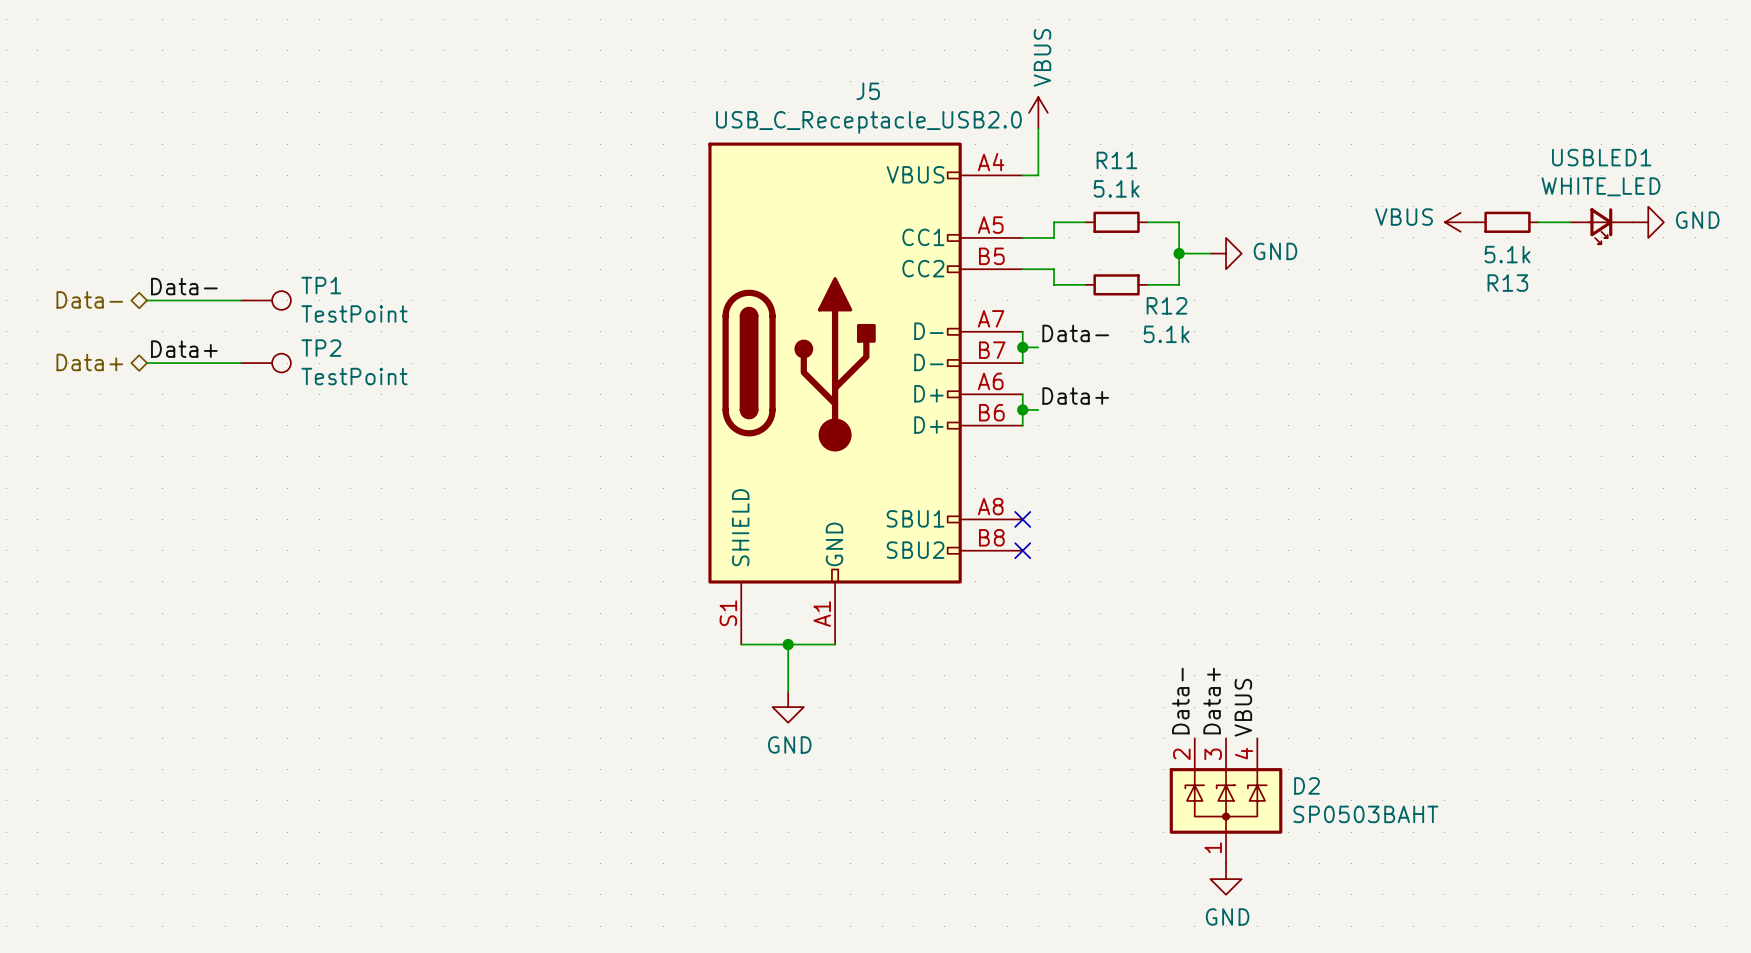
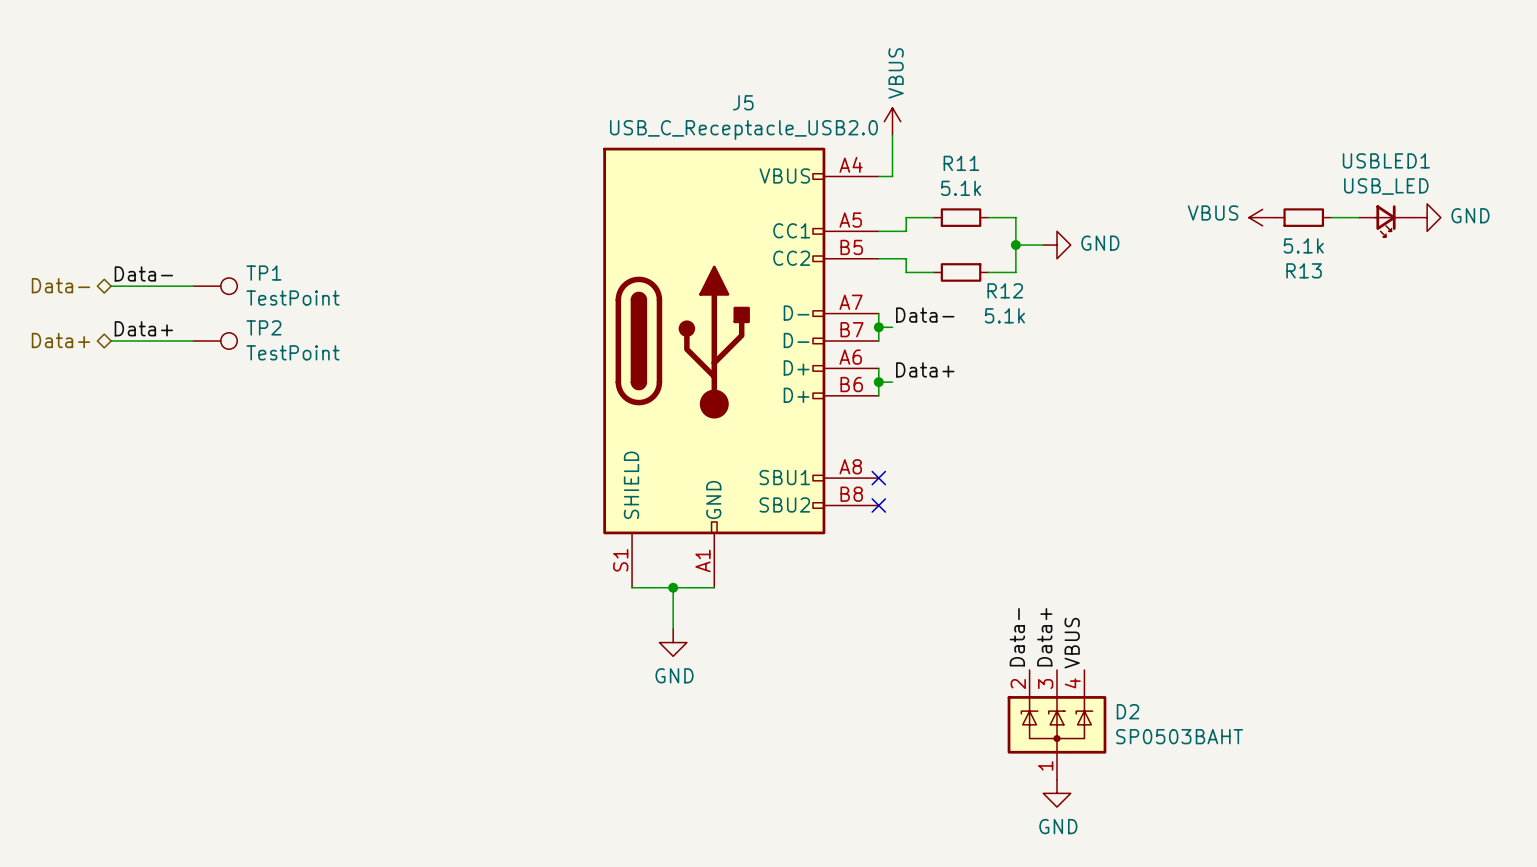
USBLED1 value: WHITE_LED (1600, 186) -> USB_LED (1386, 186)

